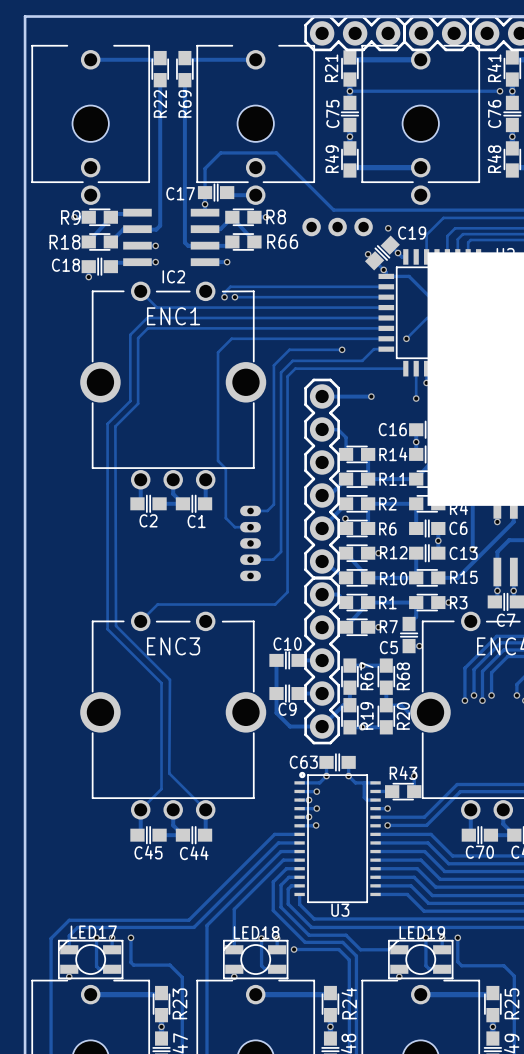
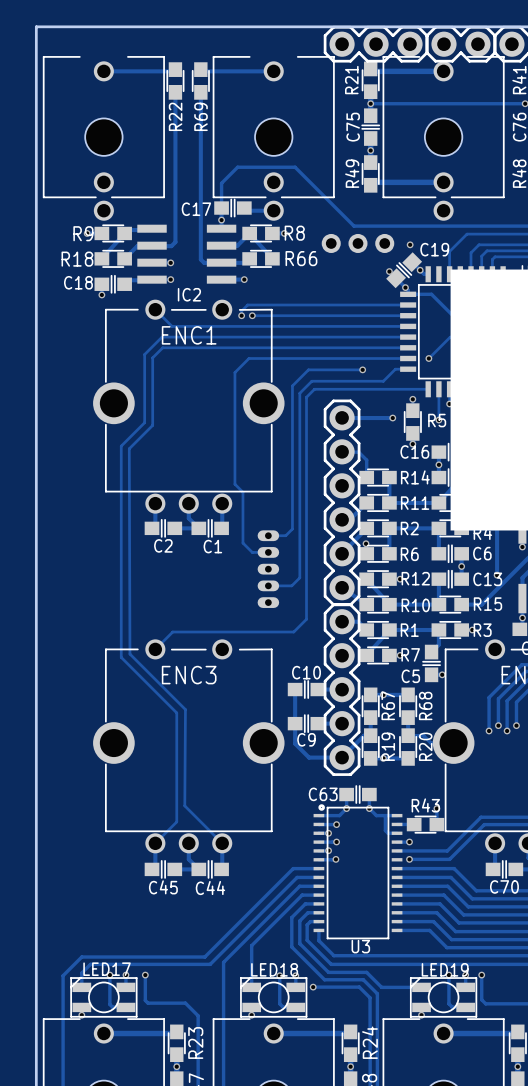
via: none -> (412, 399)
R5: none -> (412, 422)
via: none -> (412, 444)

